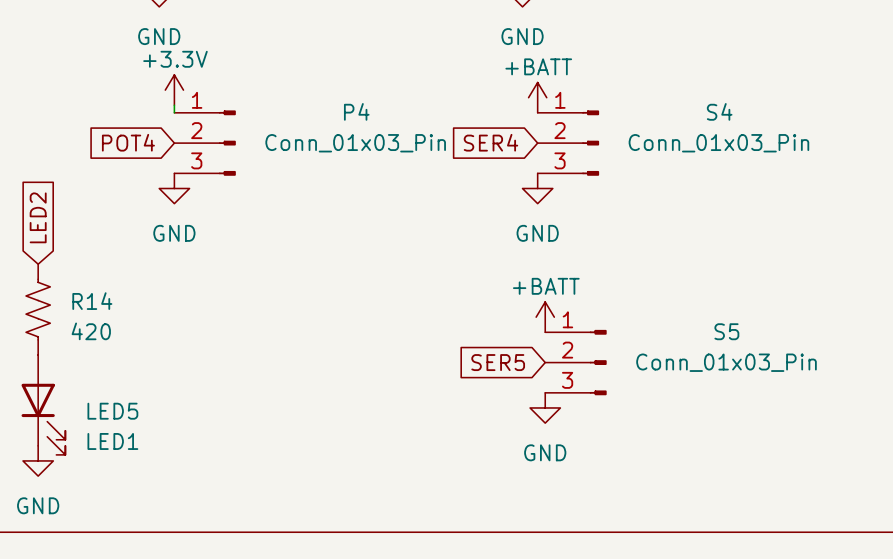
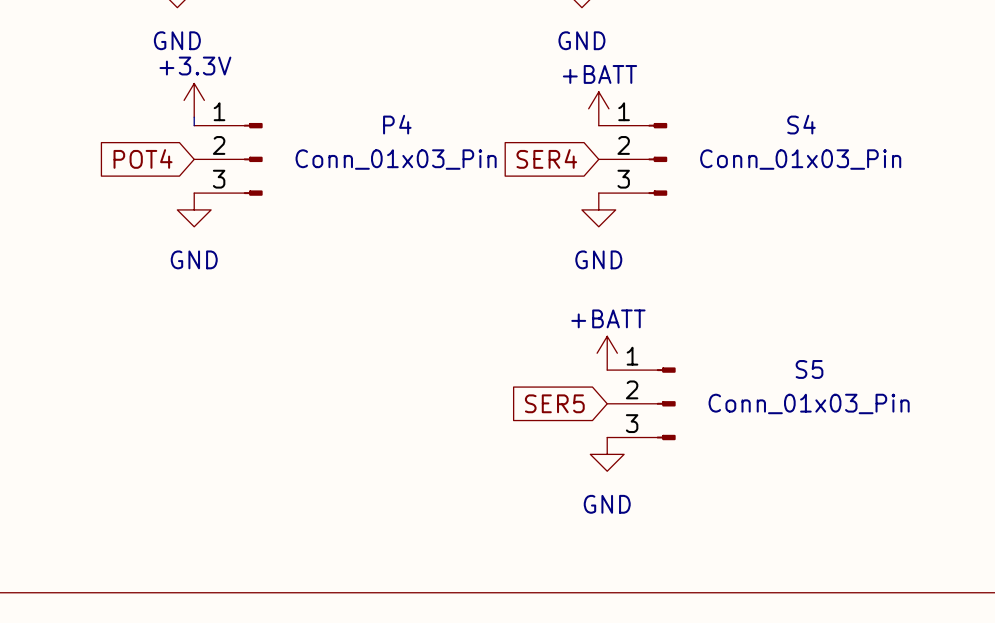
global label: LED2 (38, 217) -> none
R14: 420 (38, 309) -> none
LED5: LED1 (43, 404) -> none
power symbol: GND (38, 460) -> none

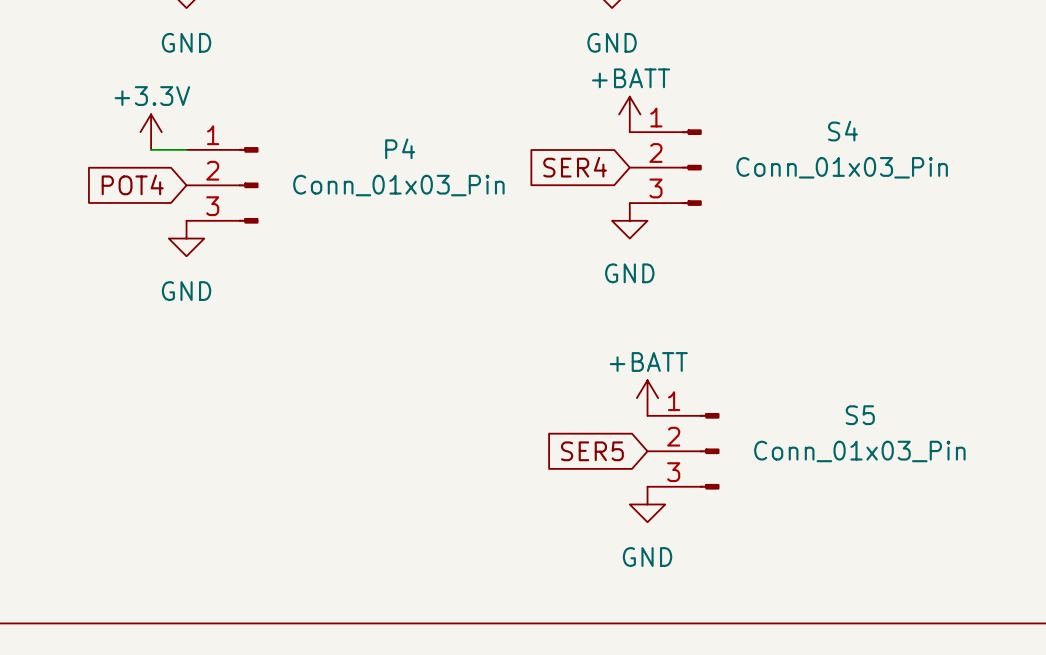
power symbol position: +3.3V (194, 100) -> +3.3V (151, 132)
wire: (194, 117) (194, 125) -> none
global label position: POT4 (143, 158) -> POT4 (132, 184)
P4 position: (228, 159) -> (222, 185)
power symbol position: GND (194, 209) -> GND (186, 238)
power symbol position: +BATT (607, 353) -> +BATT (647, 398)
global label position: SER5 (554, 403) -> SER5 (592, 451)
S5 position: (641, 403) -> (683, 451)
power symbol position: GND (607, 454) -> GND (647, 504)

